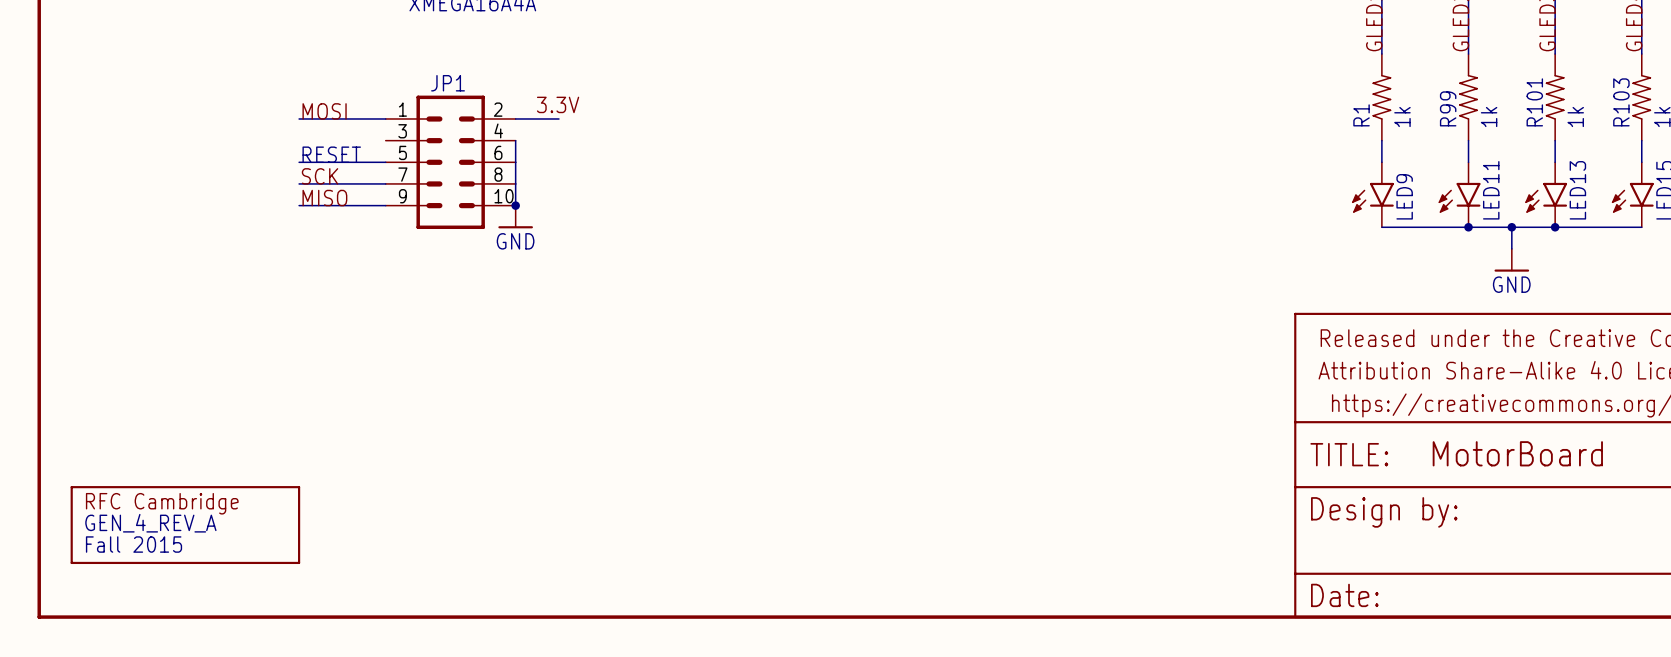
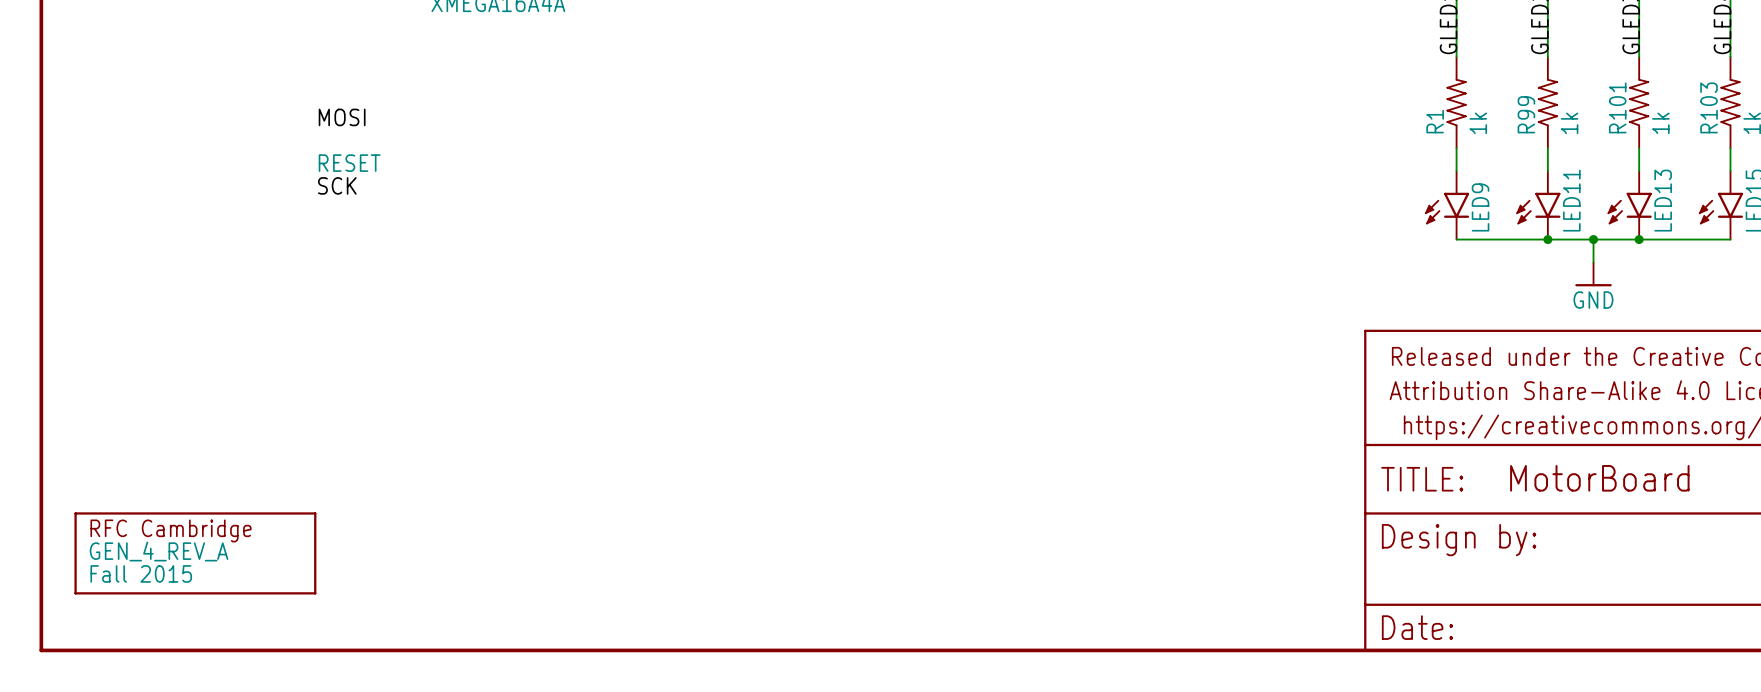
label: 3.3V (558, 104) -> none
wire: (299, 118) (385, 118) -> none
wire: (515, 118) (558, 118) -> none
wire: (515, 140) (515, 205) -> none
wire: (299, 162) (385, 162) -> none
JP1: (450, 162) -> none
wire: (299, 183) (385, 183) -> none
label: MISO (324, 198) -> none
wire: (299, 205) (385, 205) -> none
junction: (515, 205) -> none
power symbol: GND (515, 216) -> none

